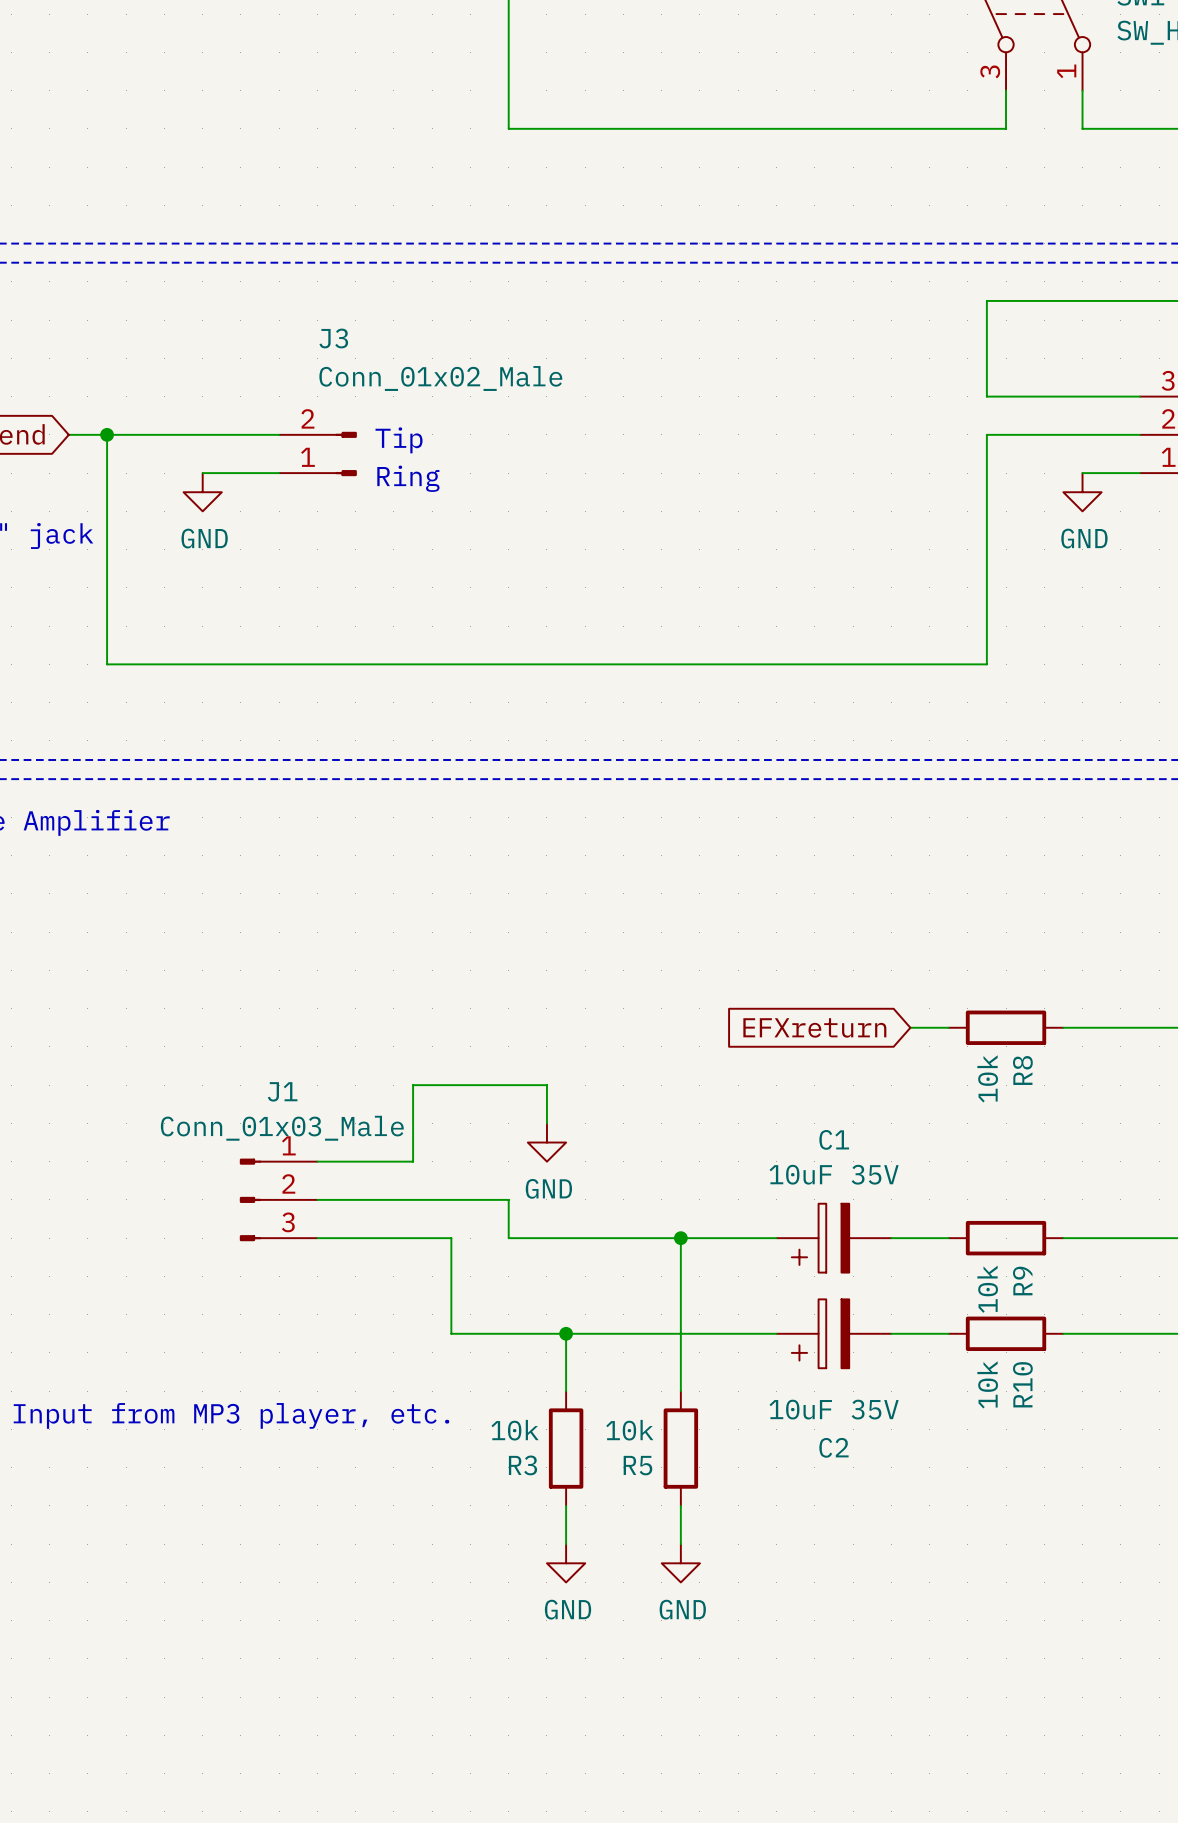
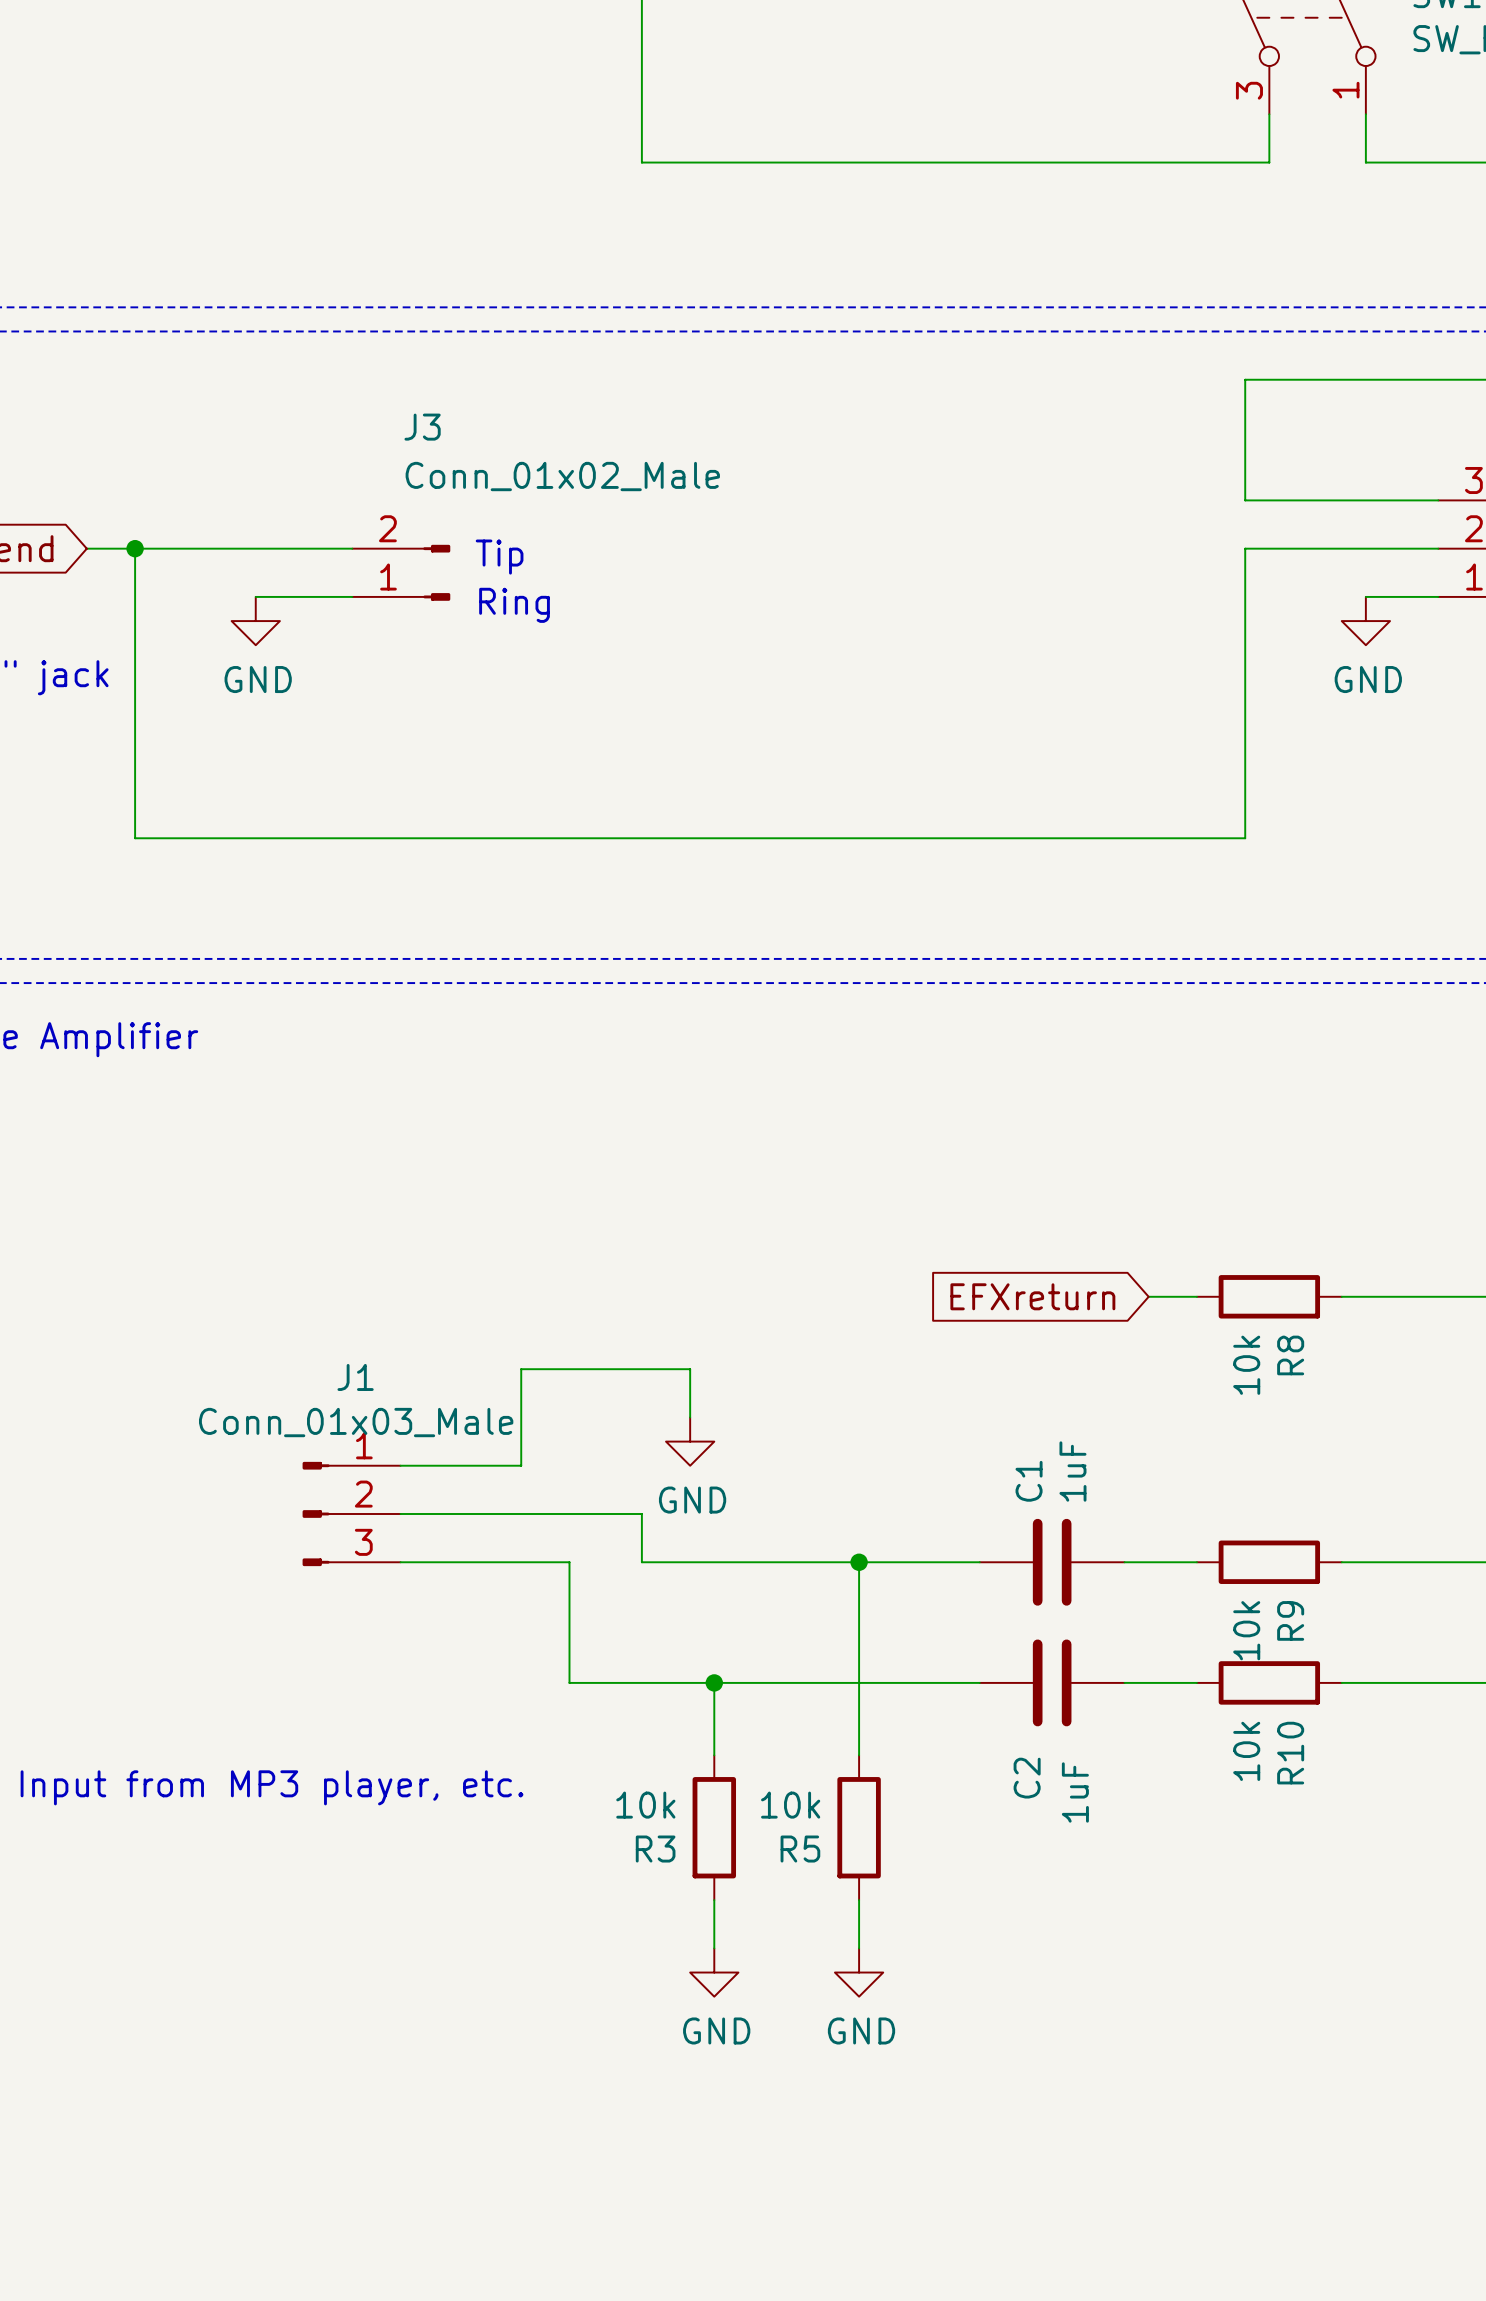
C1 name position: C1 (834, 1139) -> C1 (1029, 1481)
C1 value: 10uF 35V (834, 1174) -> 1uF (1072, 1471)
C1 symbol: [776, 1203, 892, 1273] -> [979, 1518, 1125, 1606]
C2 symbol: [776, 1299, 892, 1369] -> [979, 1639, 1125, 1727]
C2 value: 10uF 35V (834, 1409) -> 1uF (1075, 1792)
C2 name position: C2 (833, 1447) -> C2 (1027, 1778)

